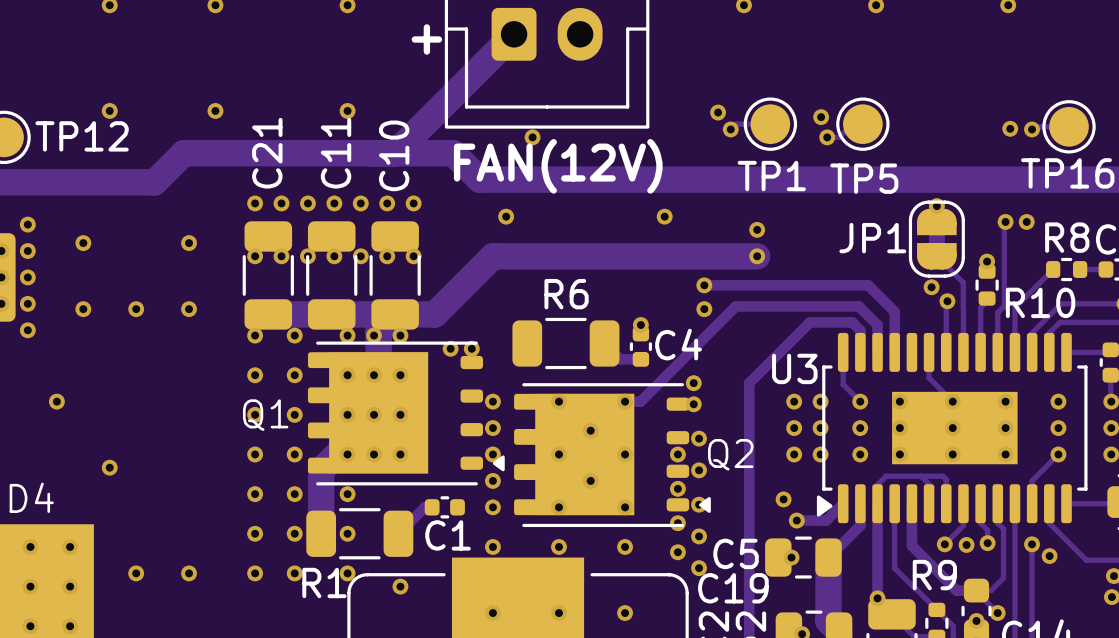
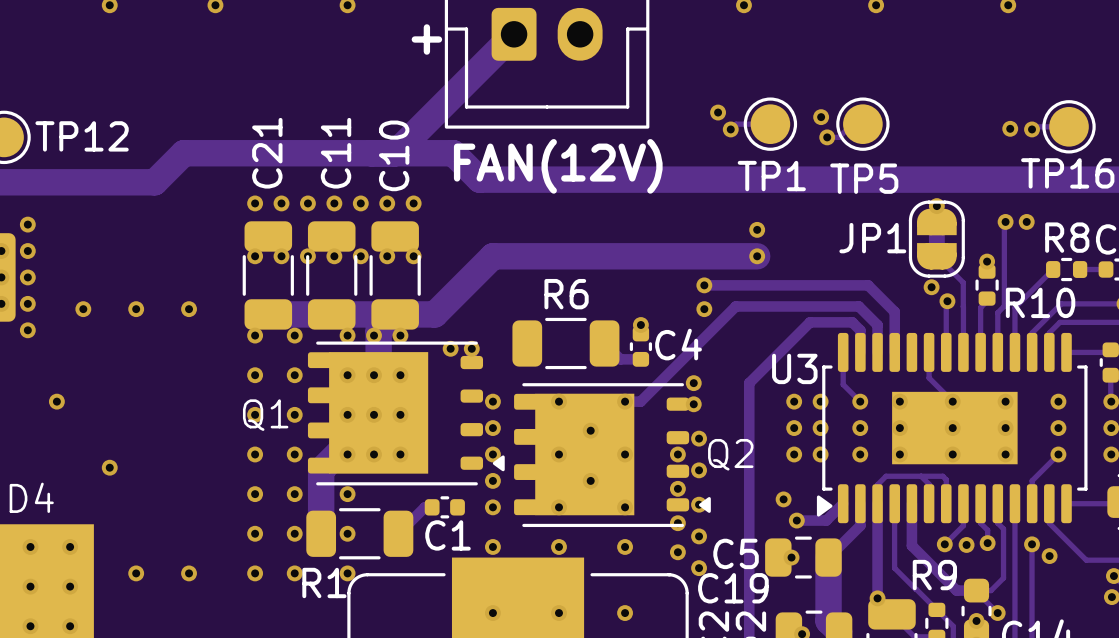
via: (109, 110) -> none
via: (215, 110) -> none
via: (347, 110) -> none
via: (532, 137) -> none
via: (506, 216) -> none
via: (664, 216) -> none
via: (83, 243) -> none
via: (189, 243) -> none
via: (400, 586) -> none

